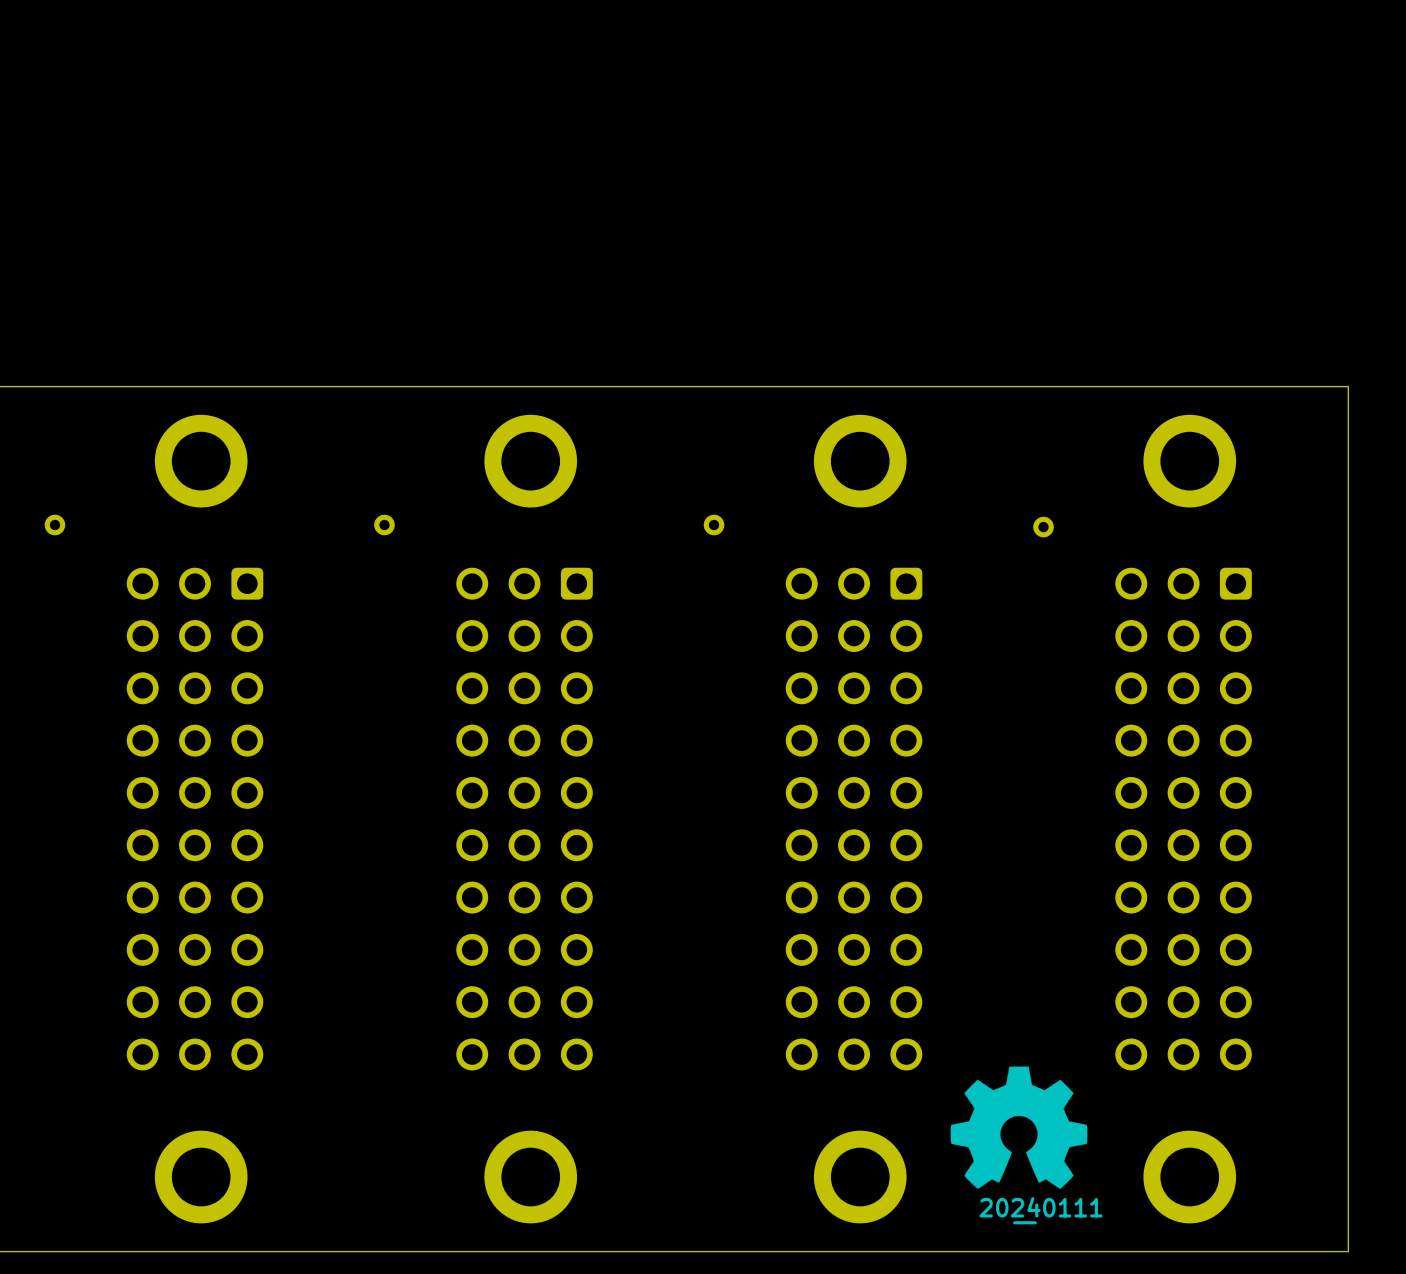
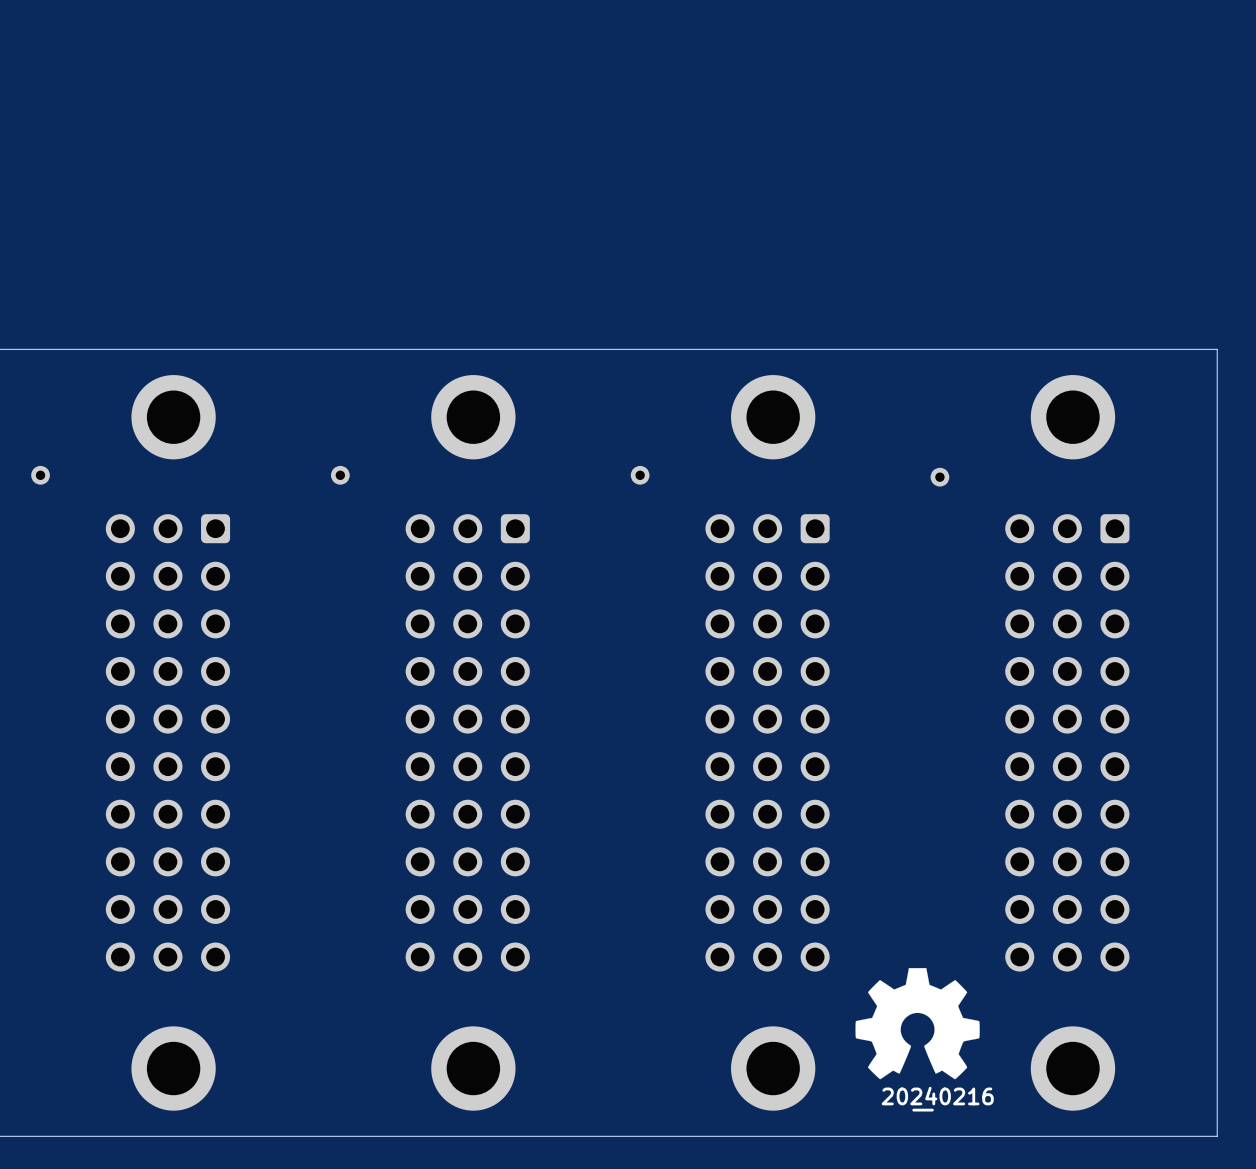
drawing shape: [979, 1197, 1103, 1225] -> [881, 1086, 994, 1112]

